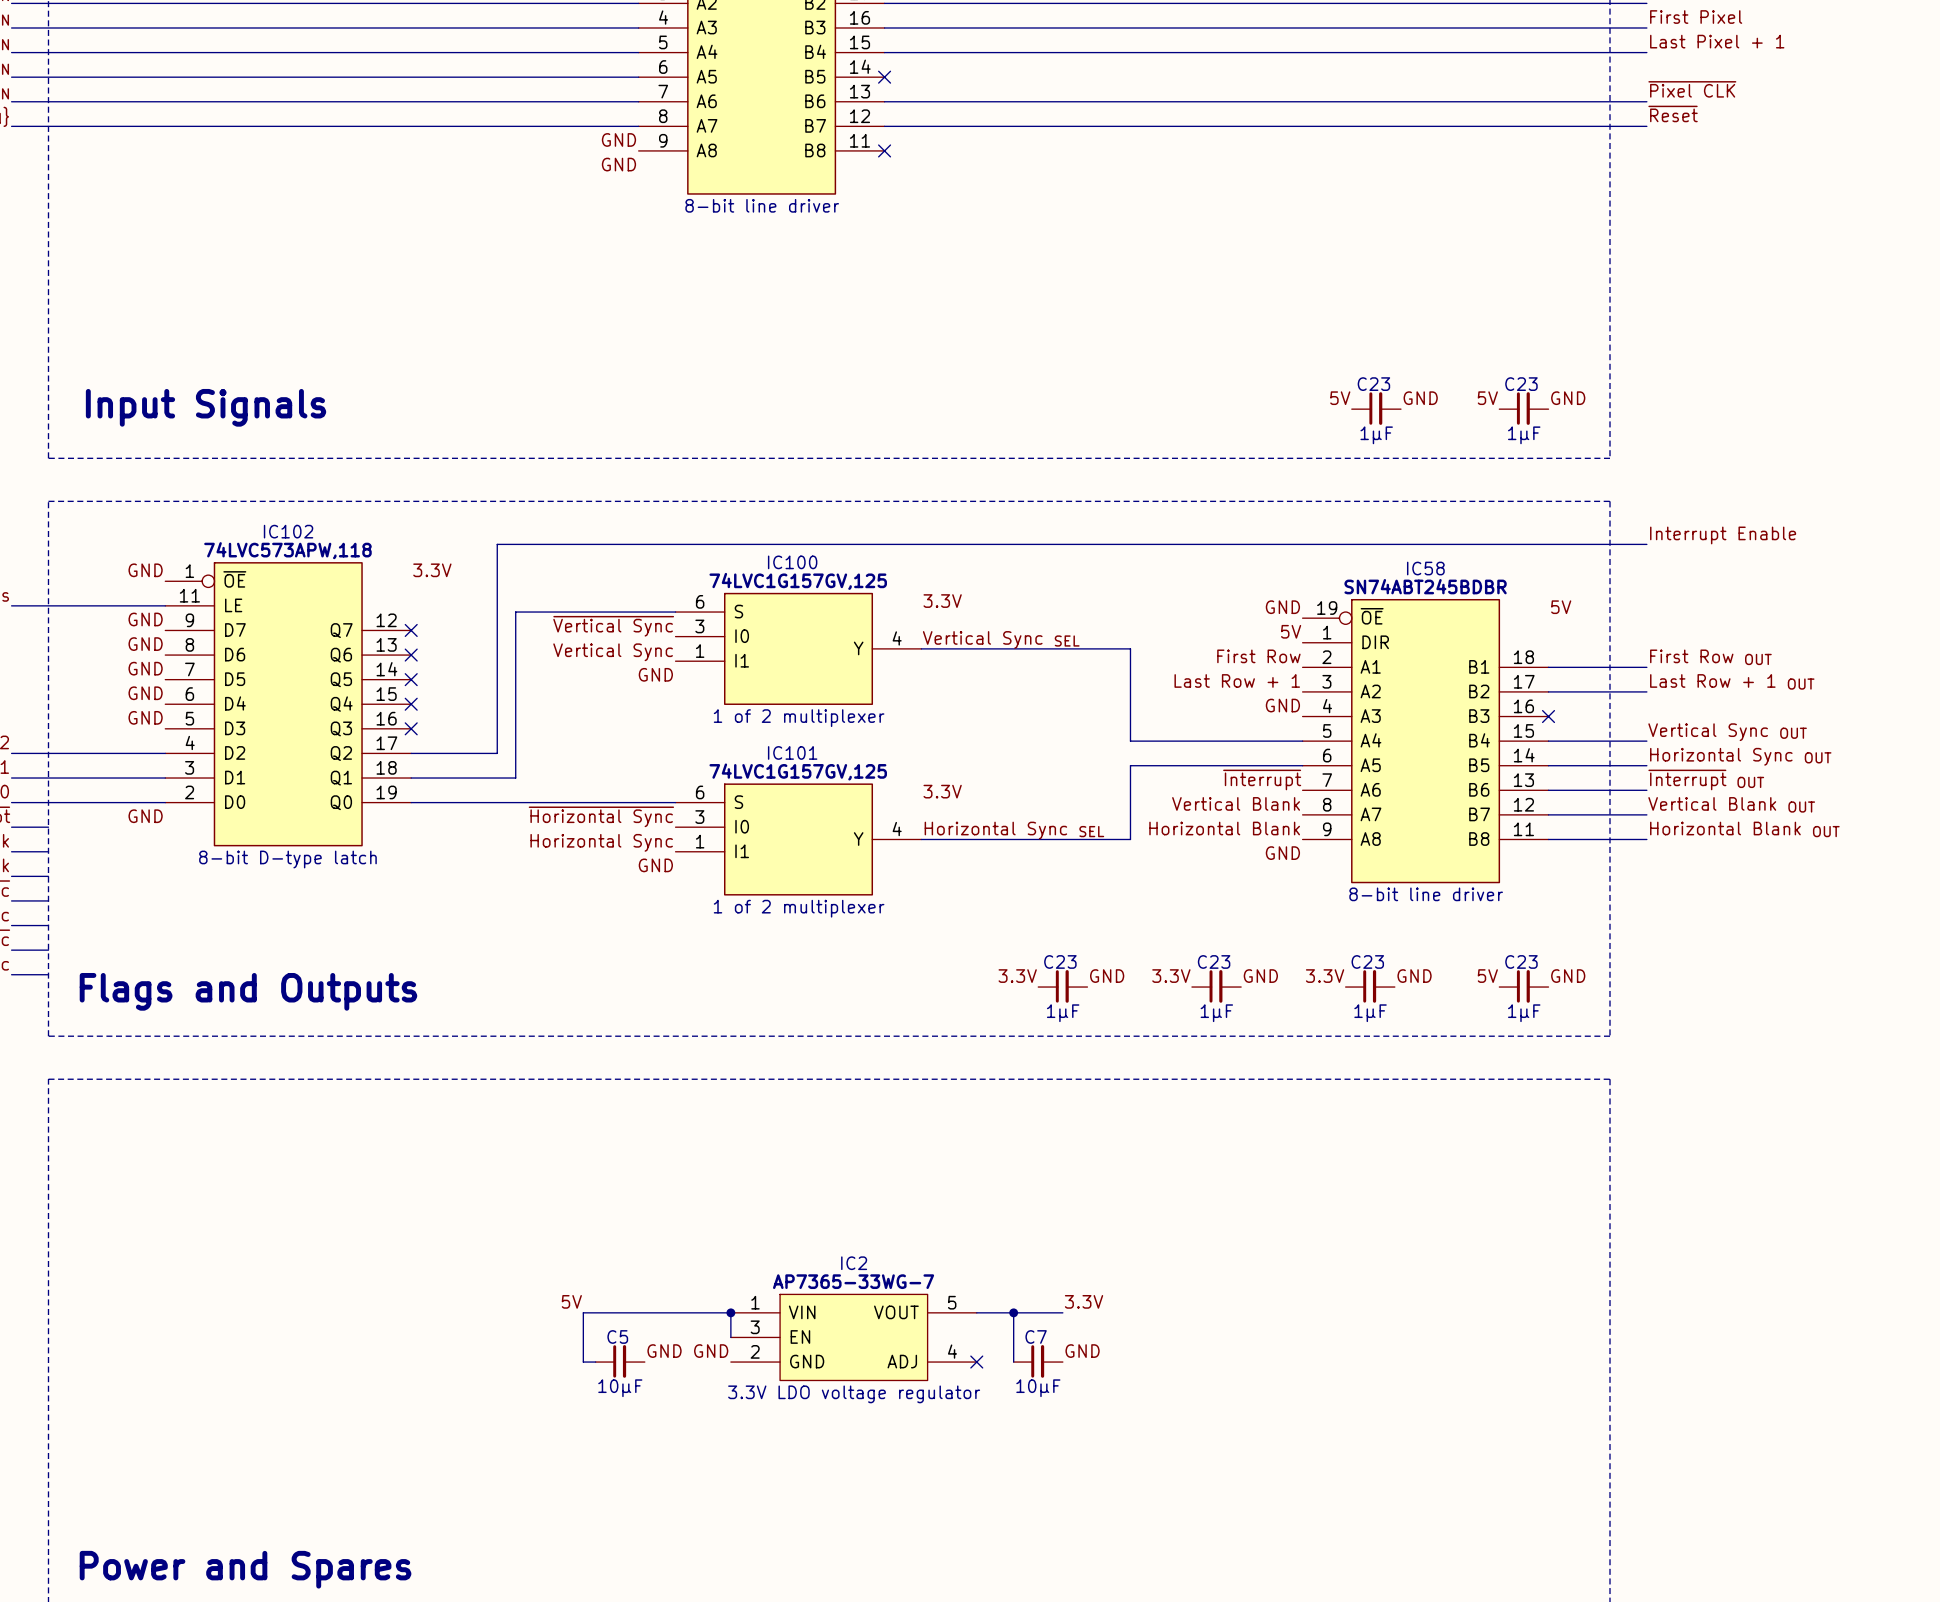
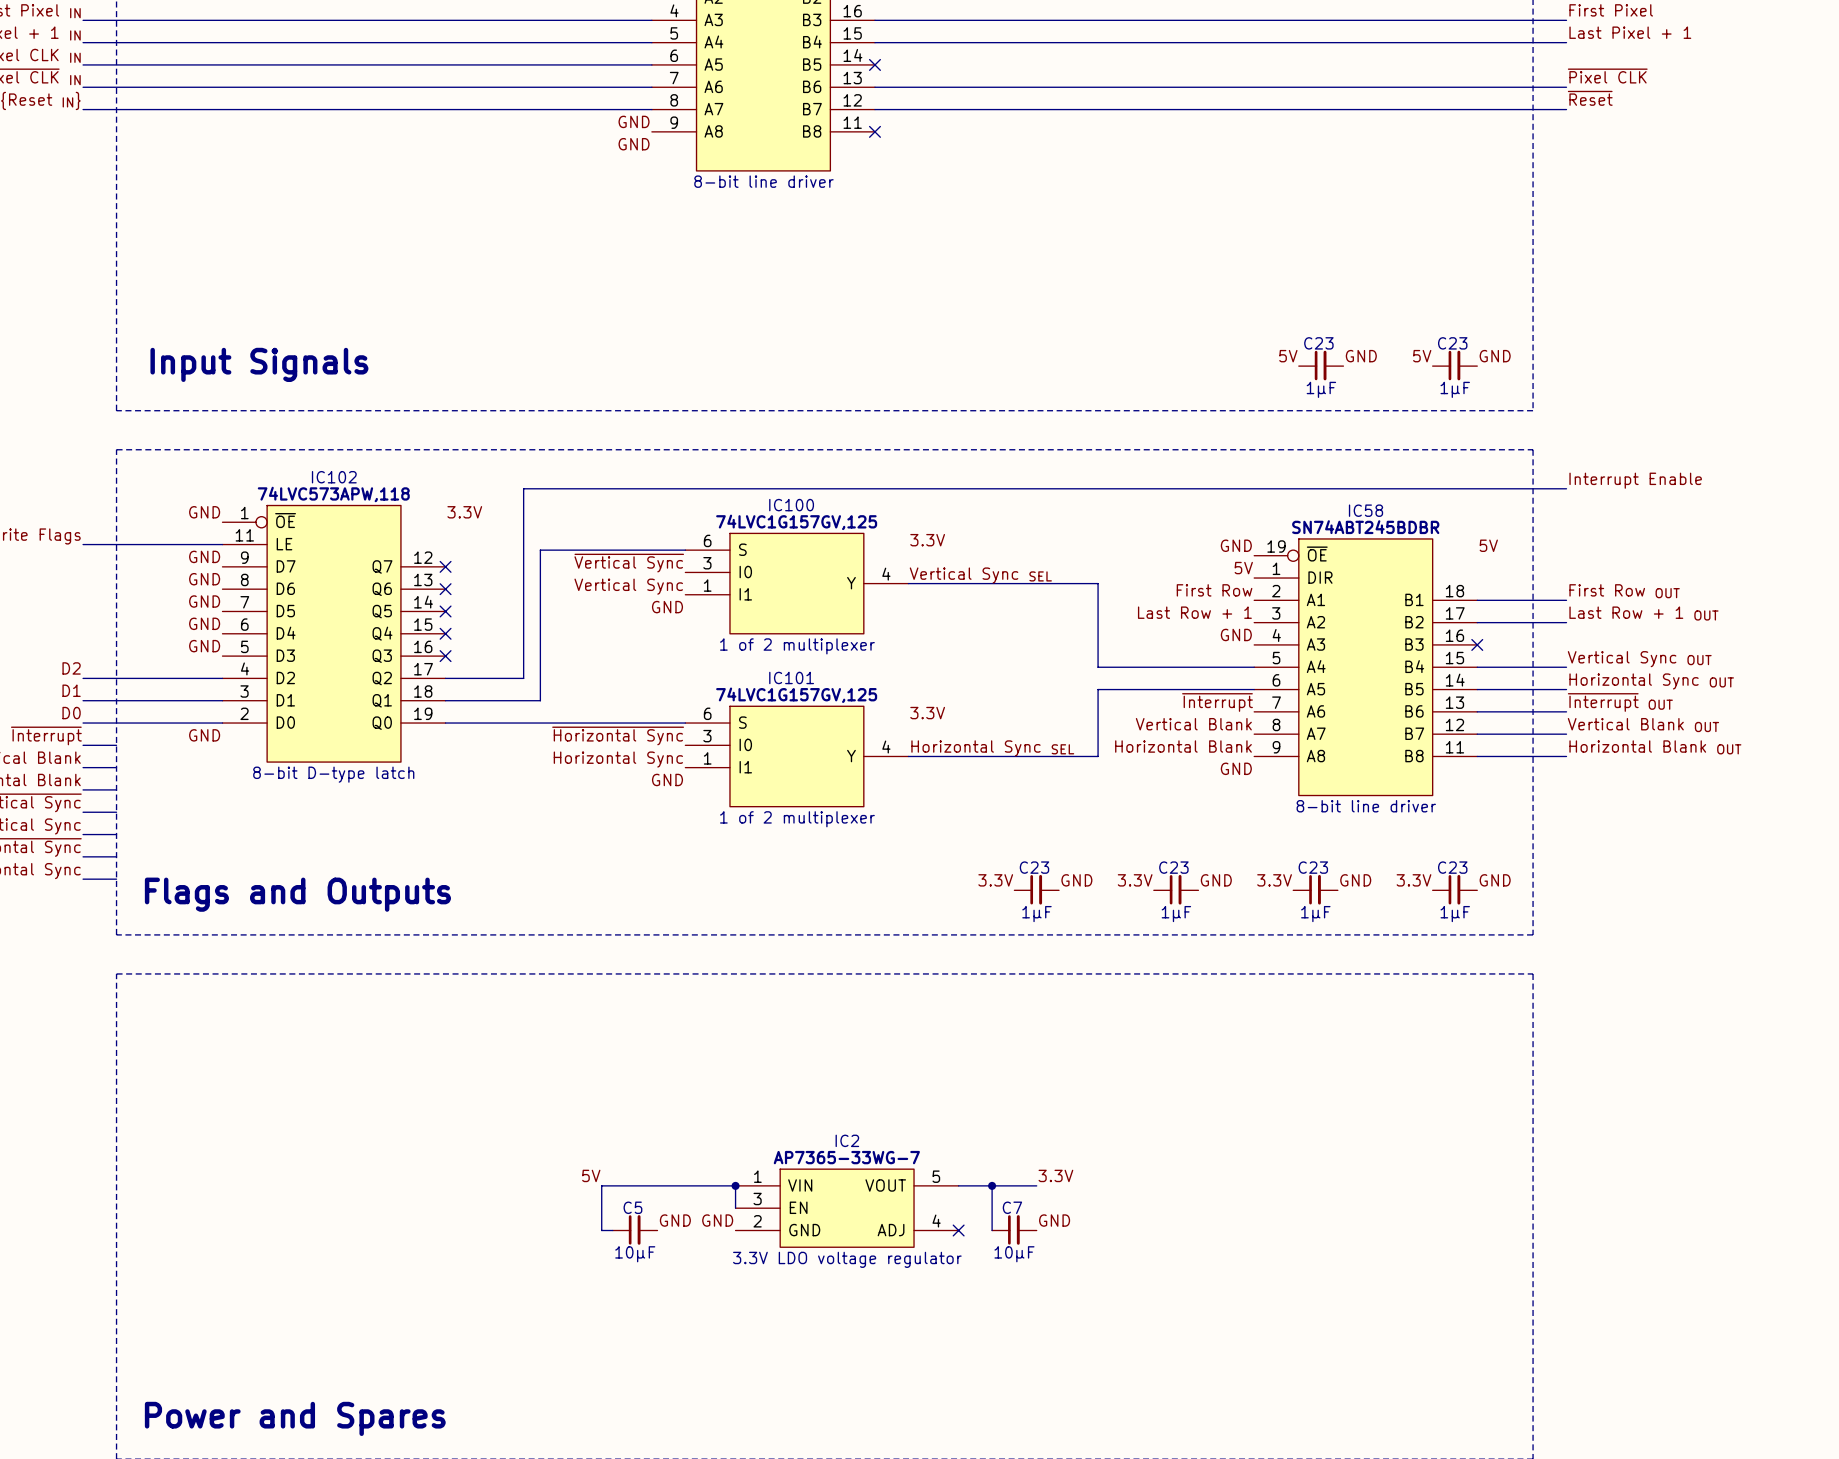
label: 5V (1487, 976) -> 3.3V (1413, 880)

